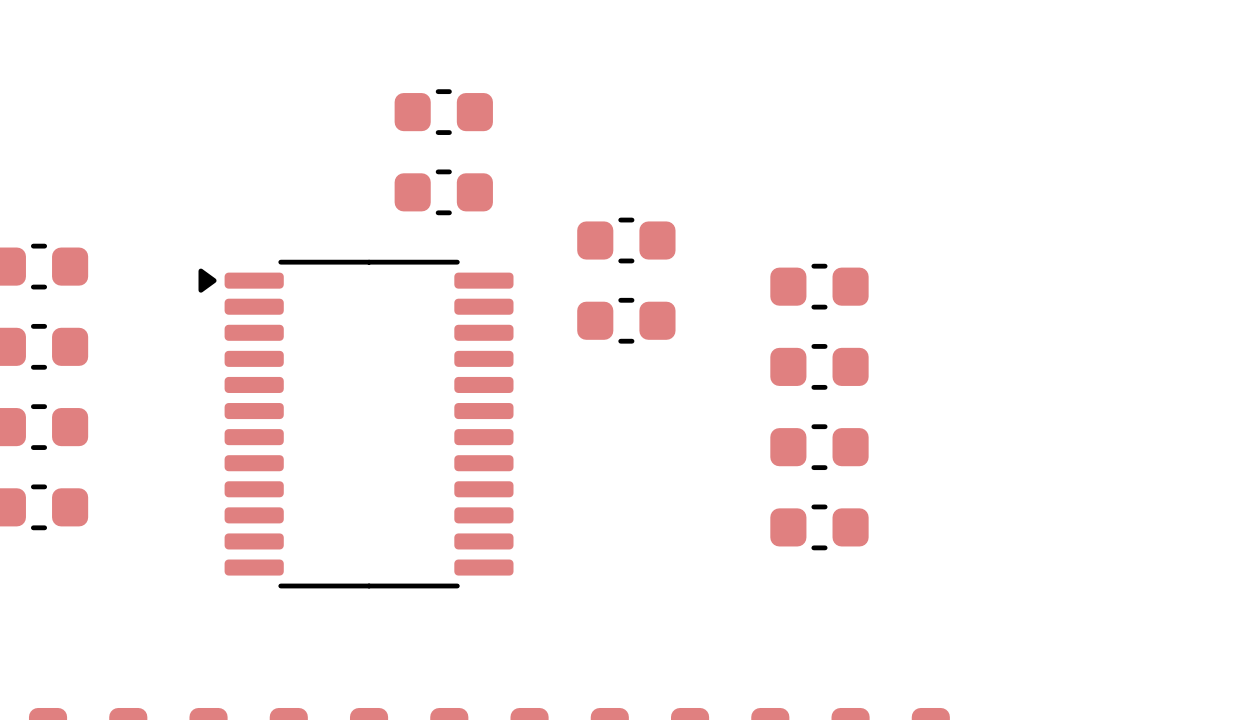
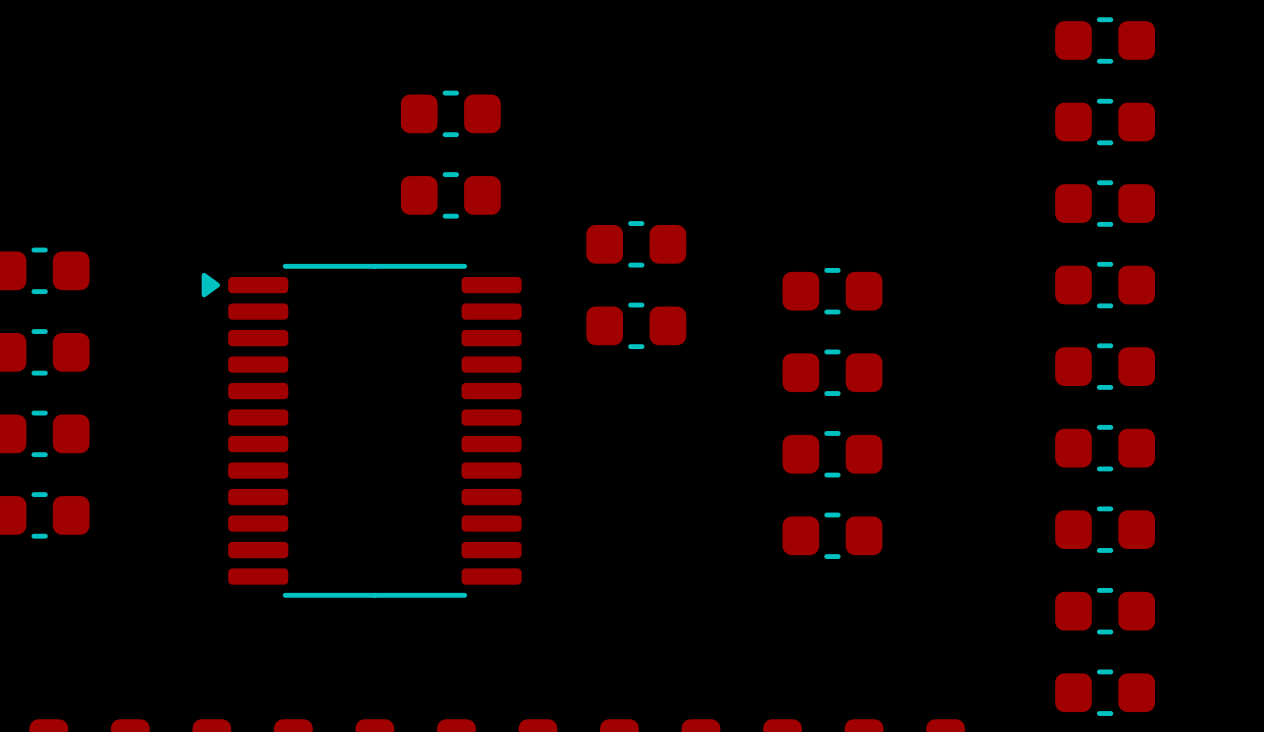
part: none -> (1105, 40)
part: none -> (1105, 122)
part: none -> (1105, 203)
part: none -> (1105, 285)
part: none -> (1105, 366)
part: none -> (1105, 448)
part: none -> (1105, 529)
part: none -> (1105, 611)
part: none -> (1105, 692)

